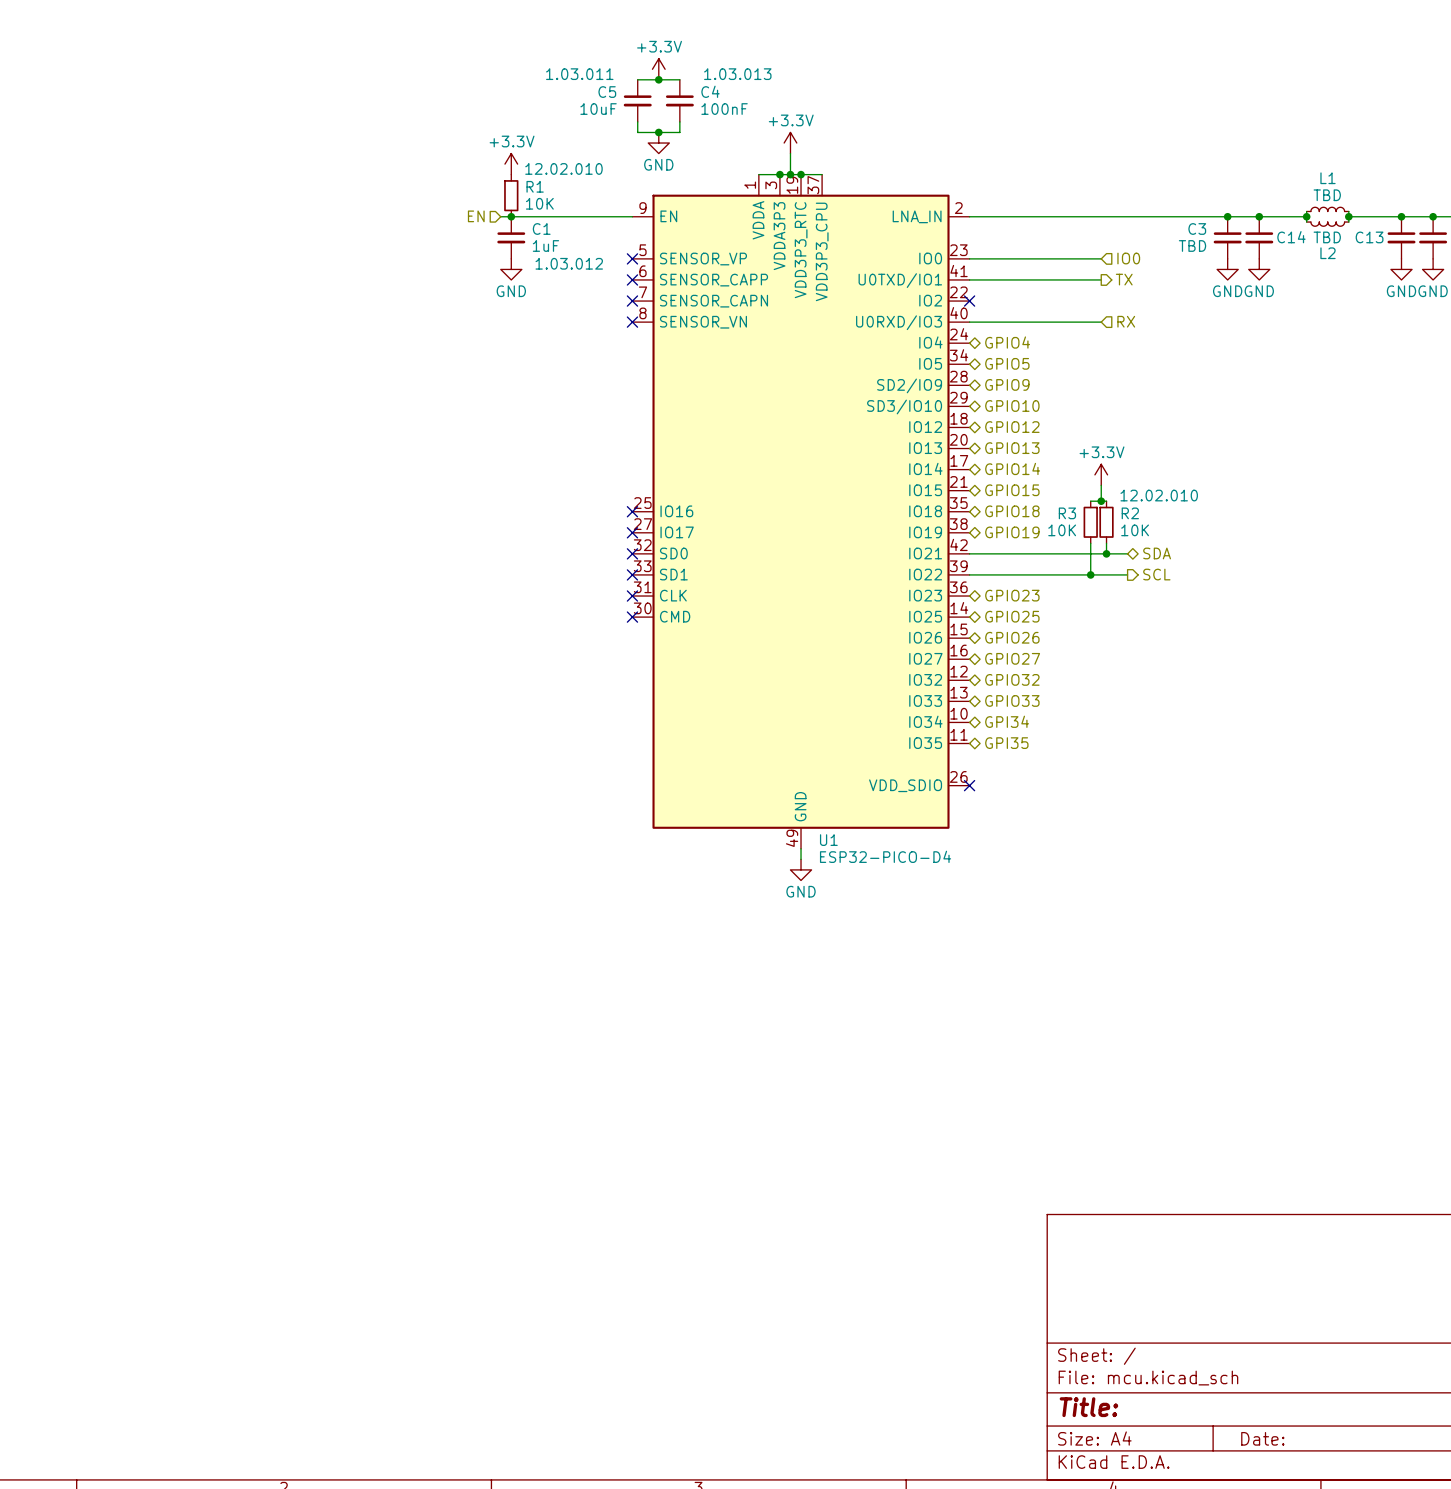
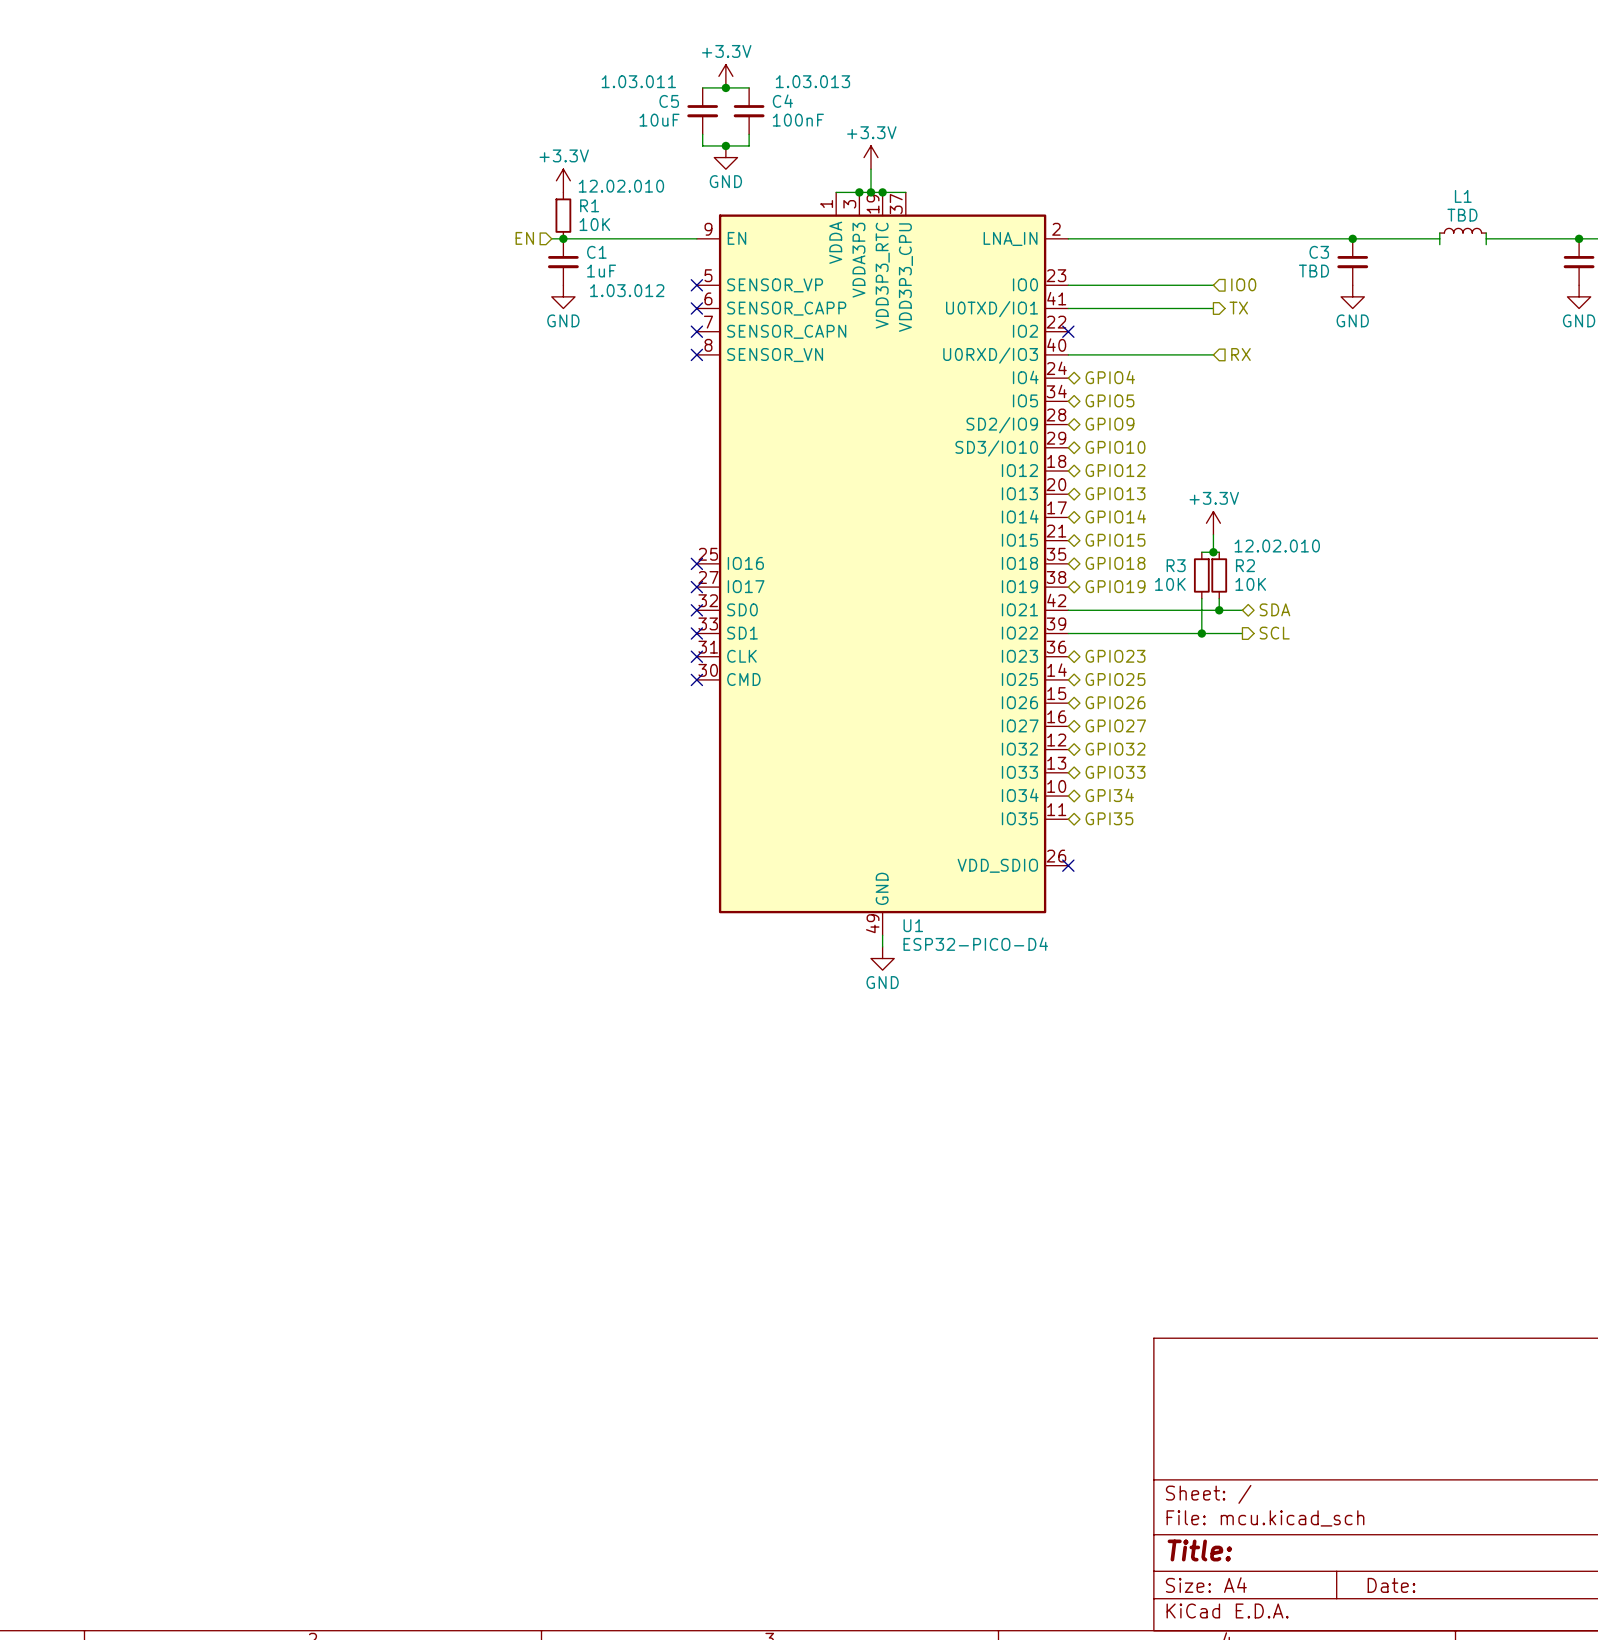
junction: (1259, 216) -> none
junction: (1306, 216) -> none
junction: (1348, 216) -> none
junction: (1401, 216) -> none
L2: TBD (1327, 224) -> none
C14: (1259, 237) -> none
C13: (1401, 237) -> none
power symbol: GND (1259, 269) -> none
power symbol: GND (1401, 269) -> none

